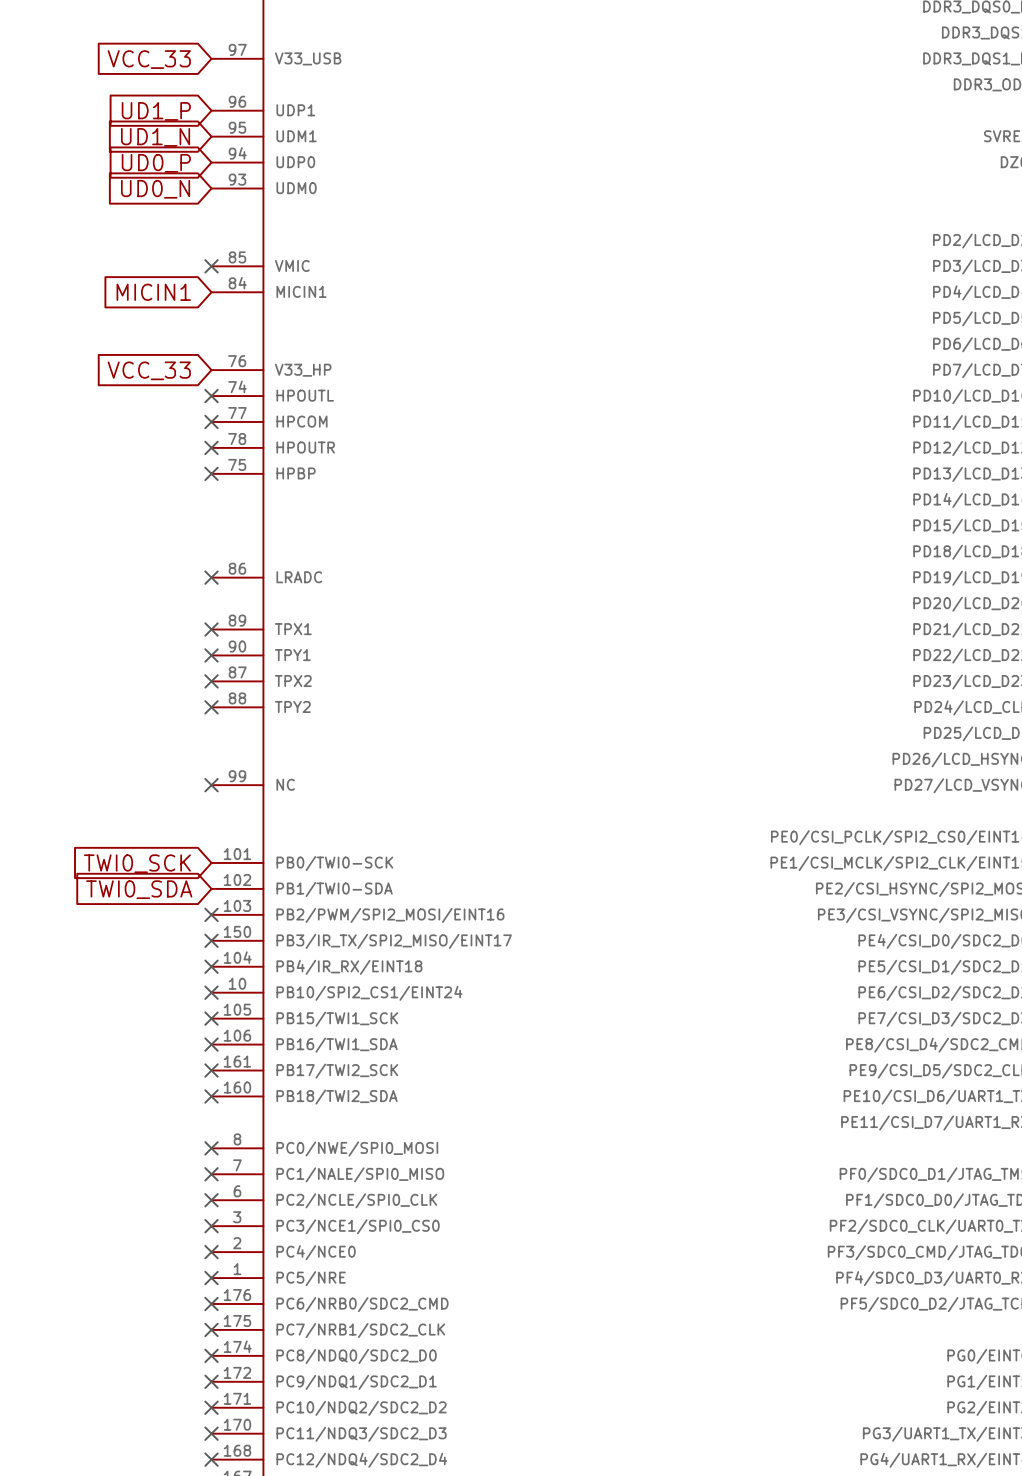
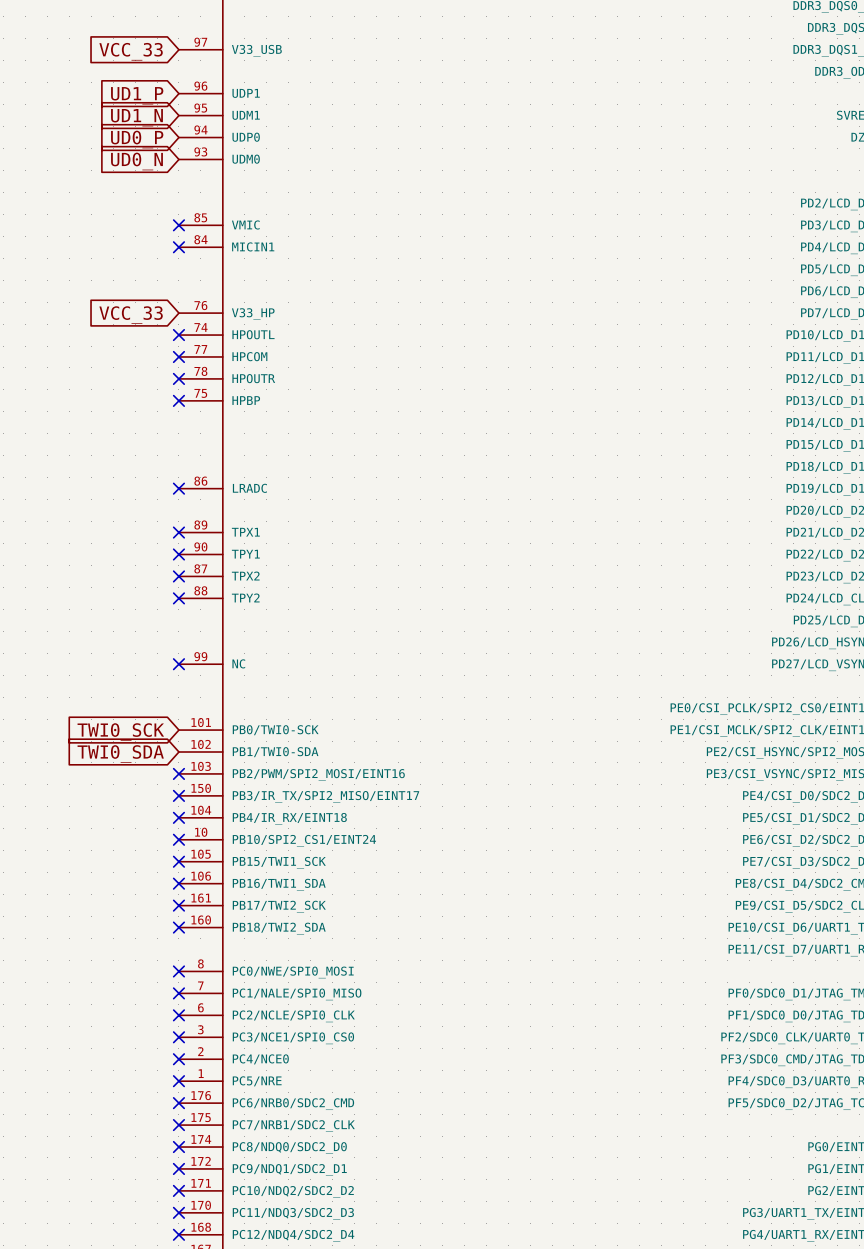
global label: MICIN1 (153, 292) -> none
no-connect mark: none -> (178, 247)

